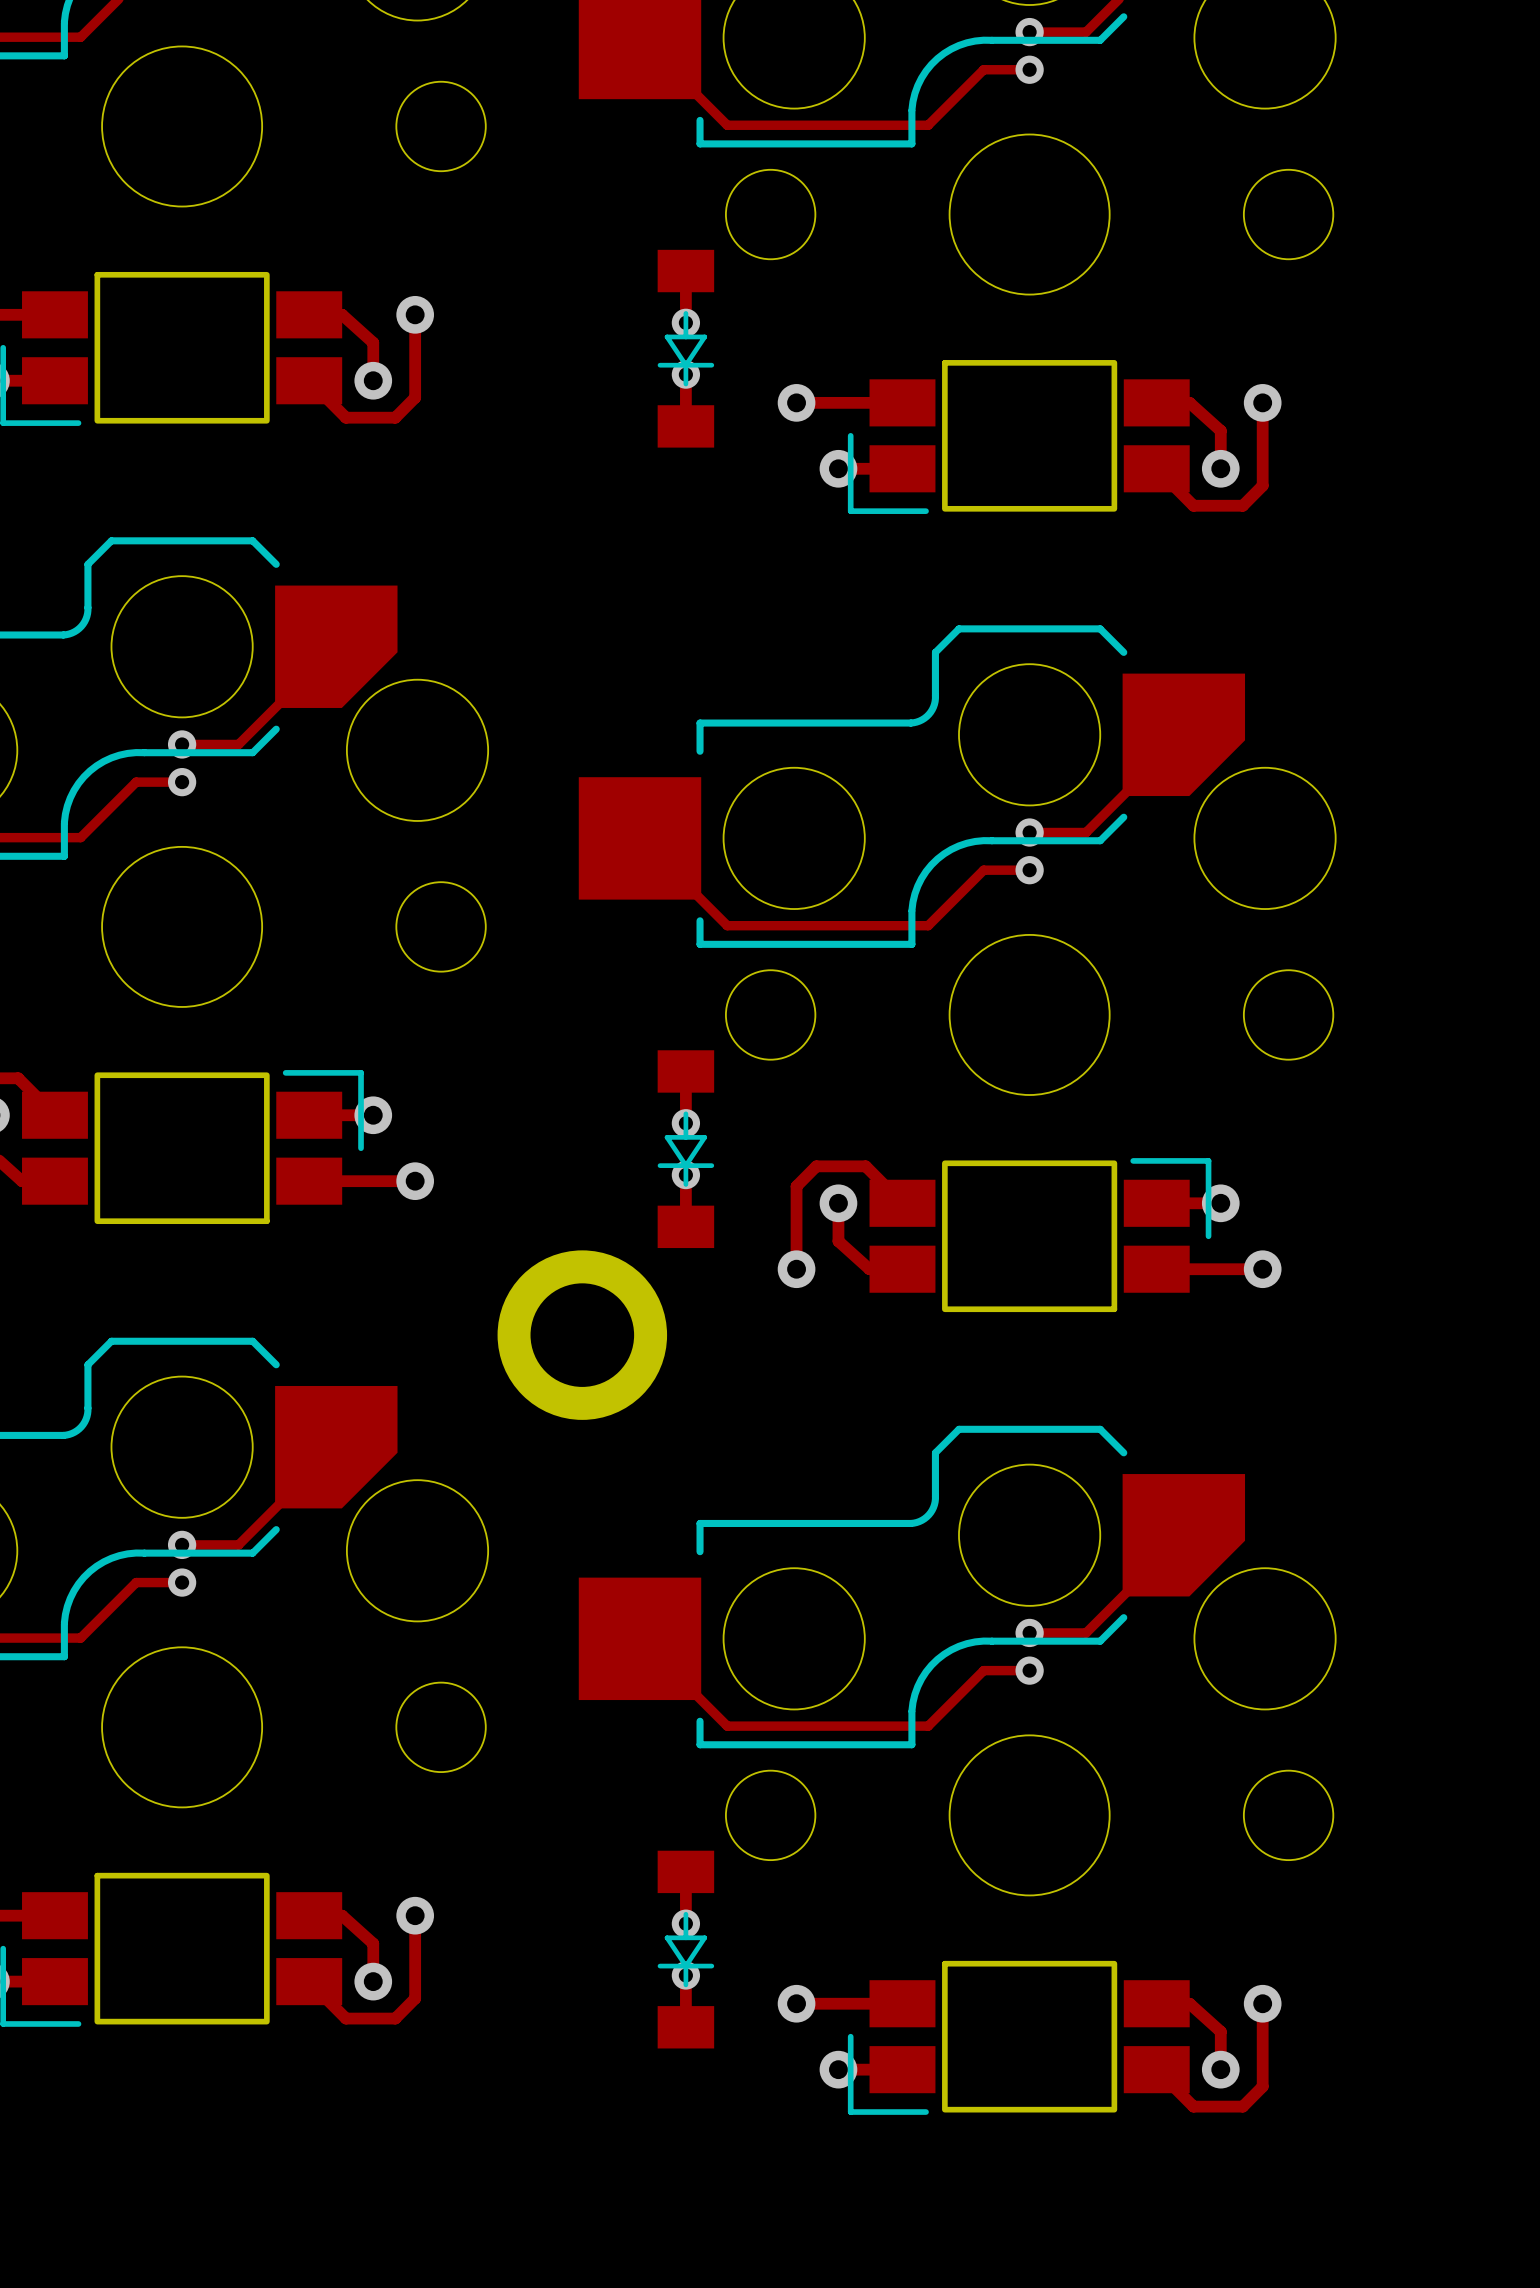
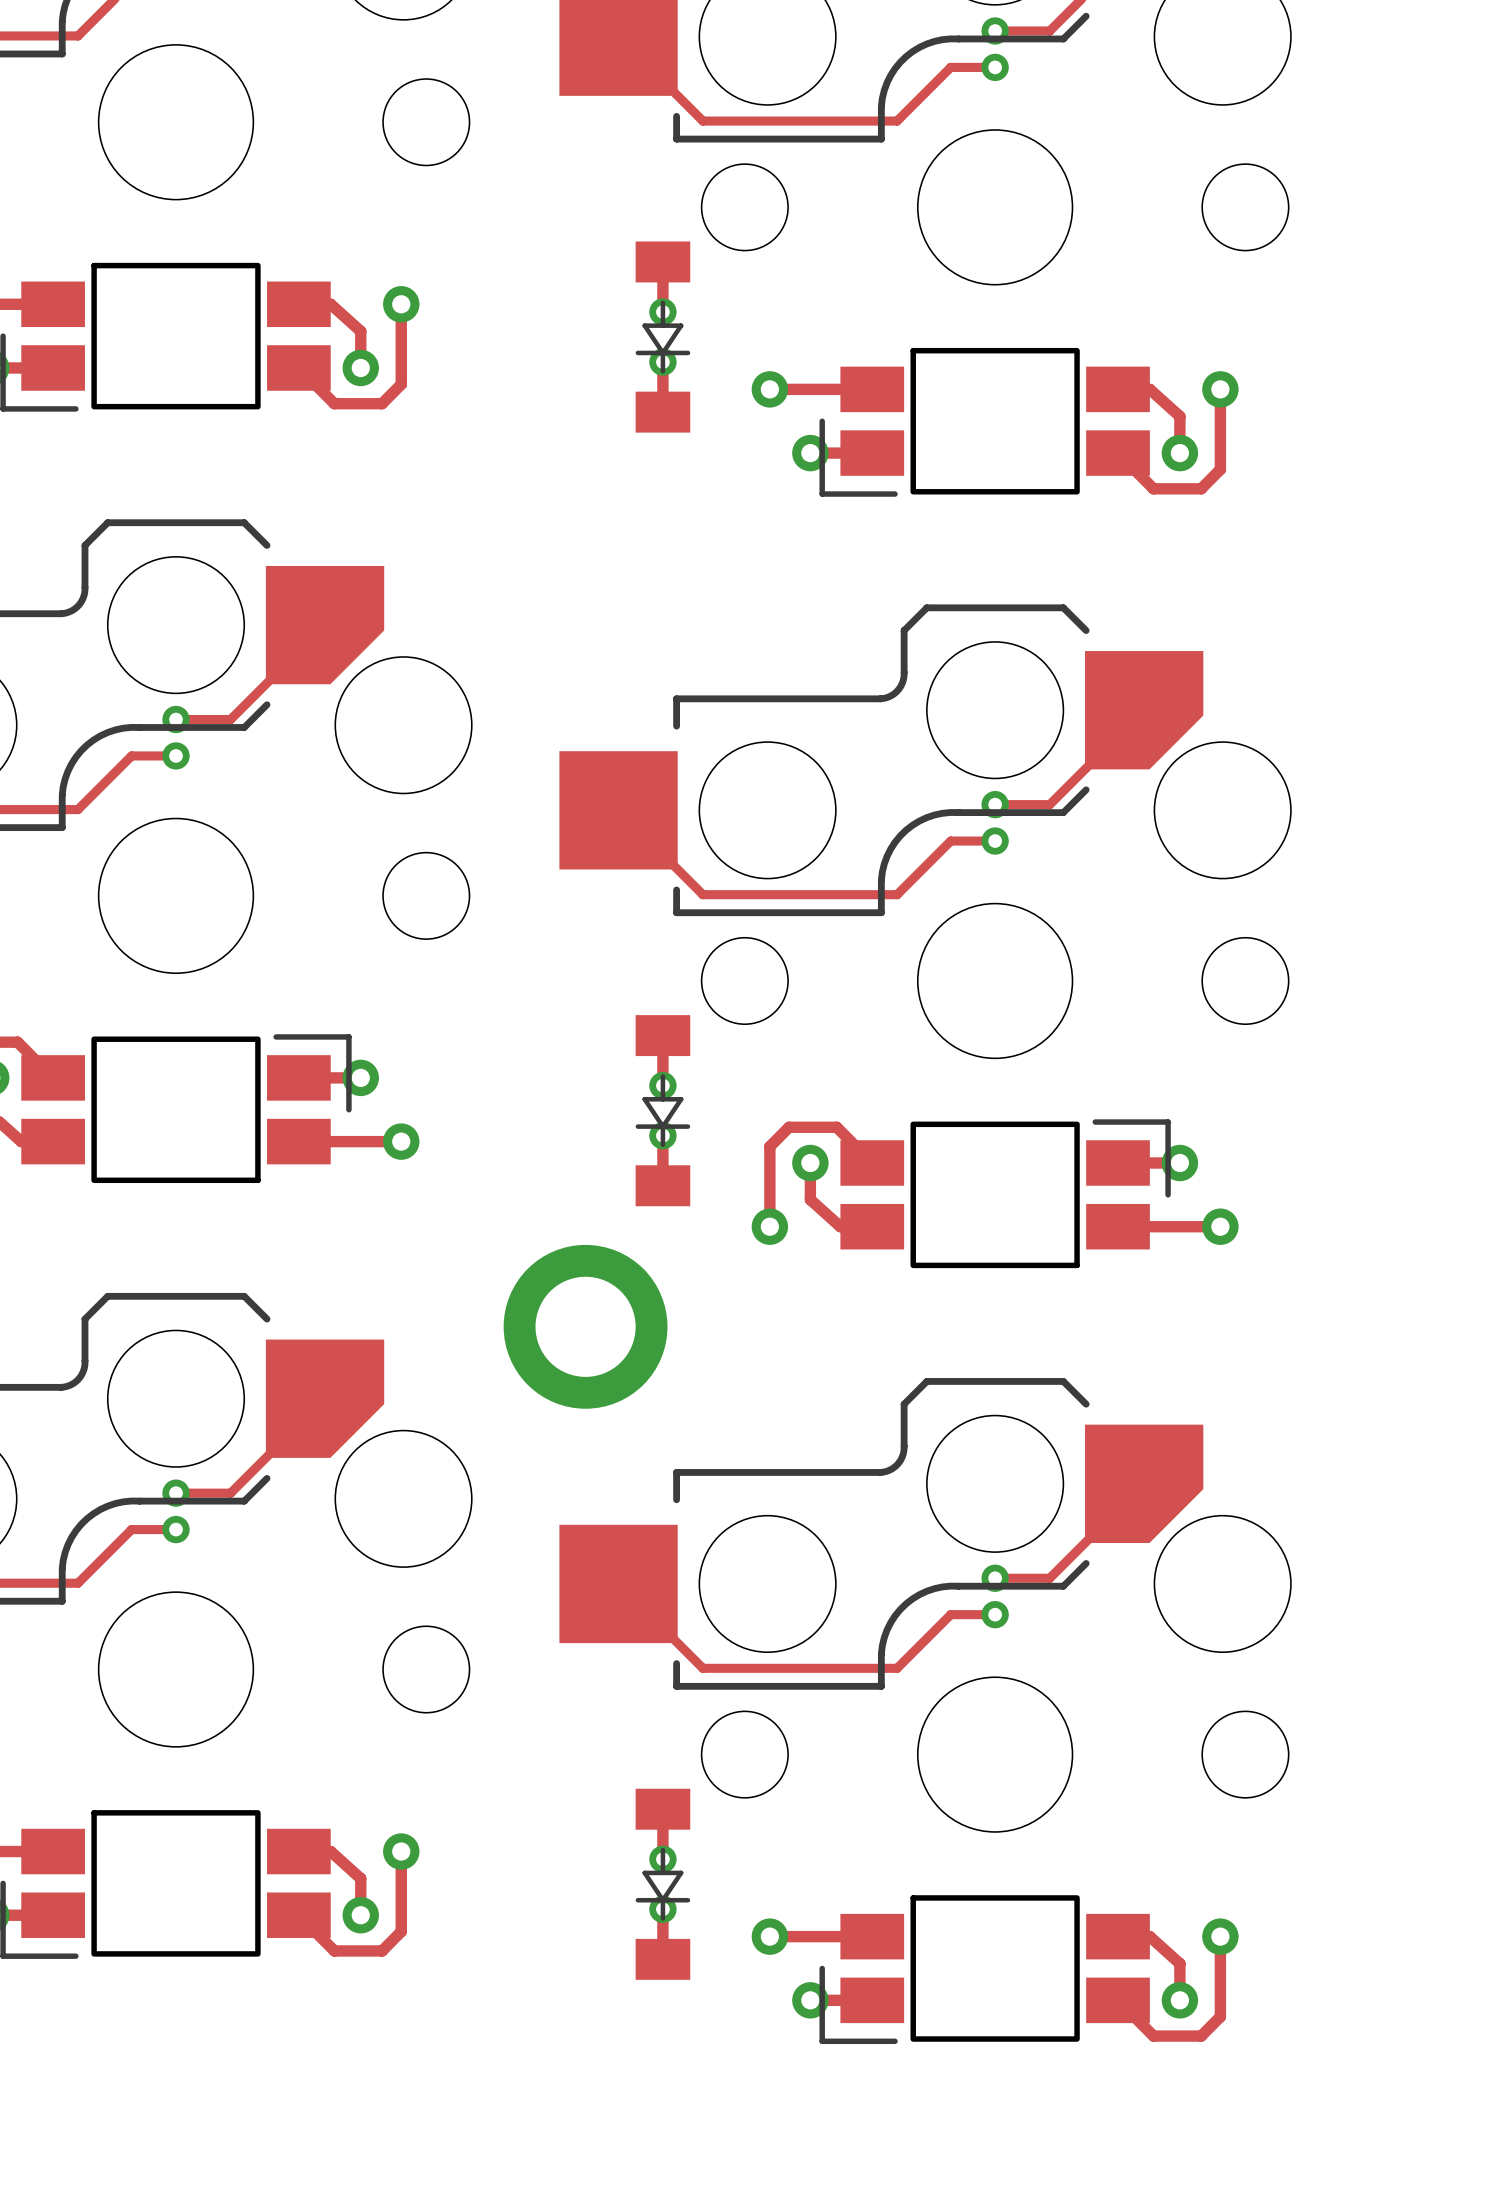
part position: (582, 1335) -> (585, 1326)

